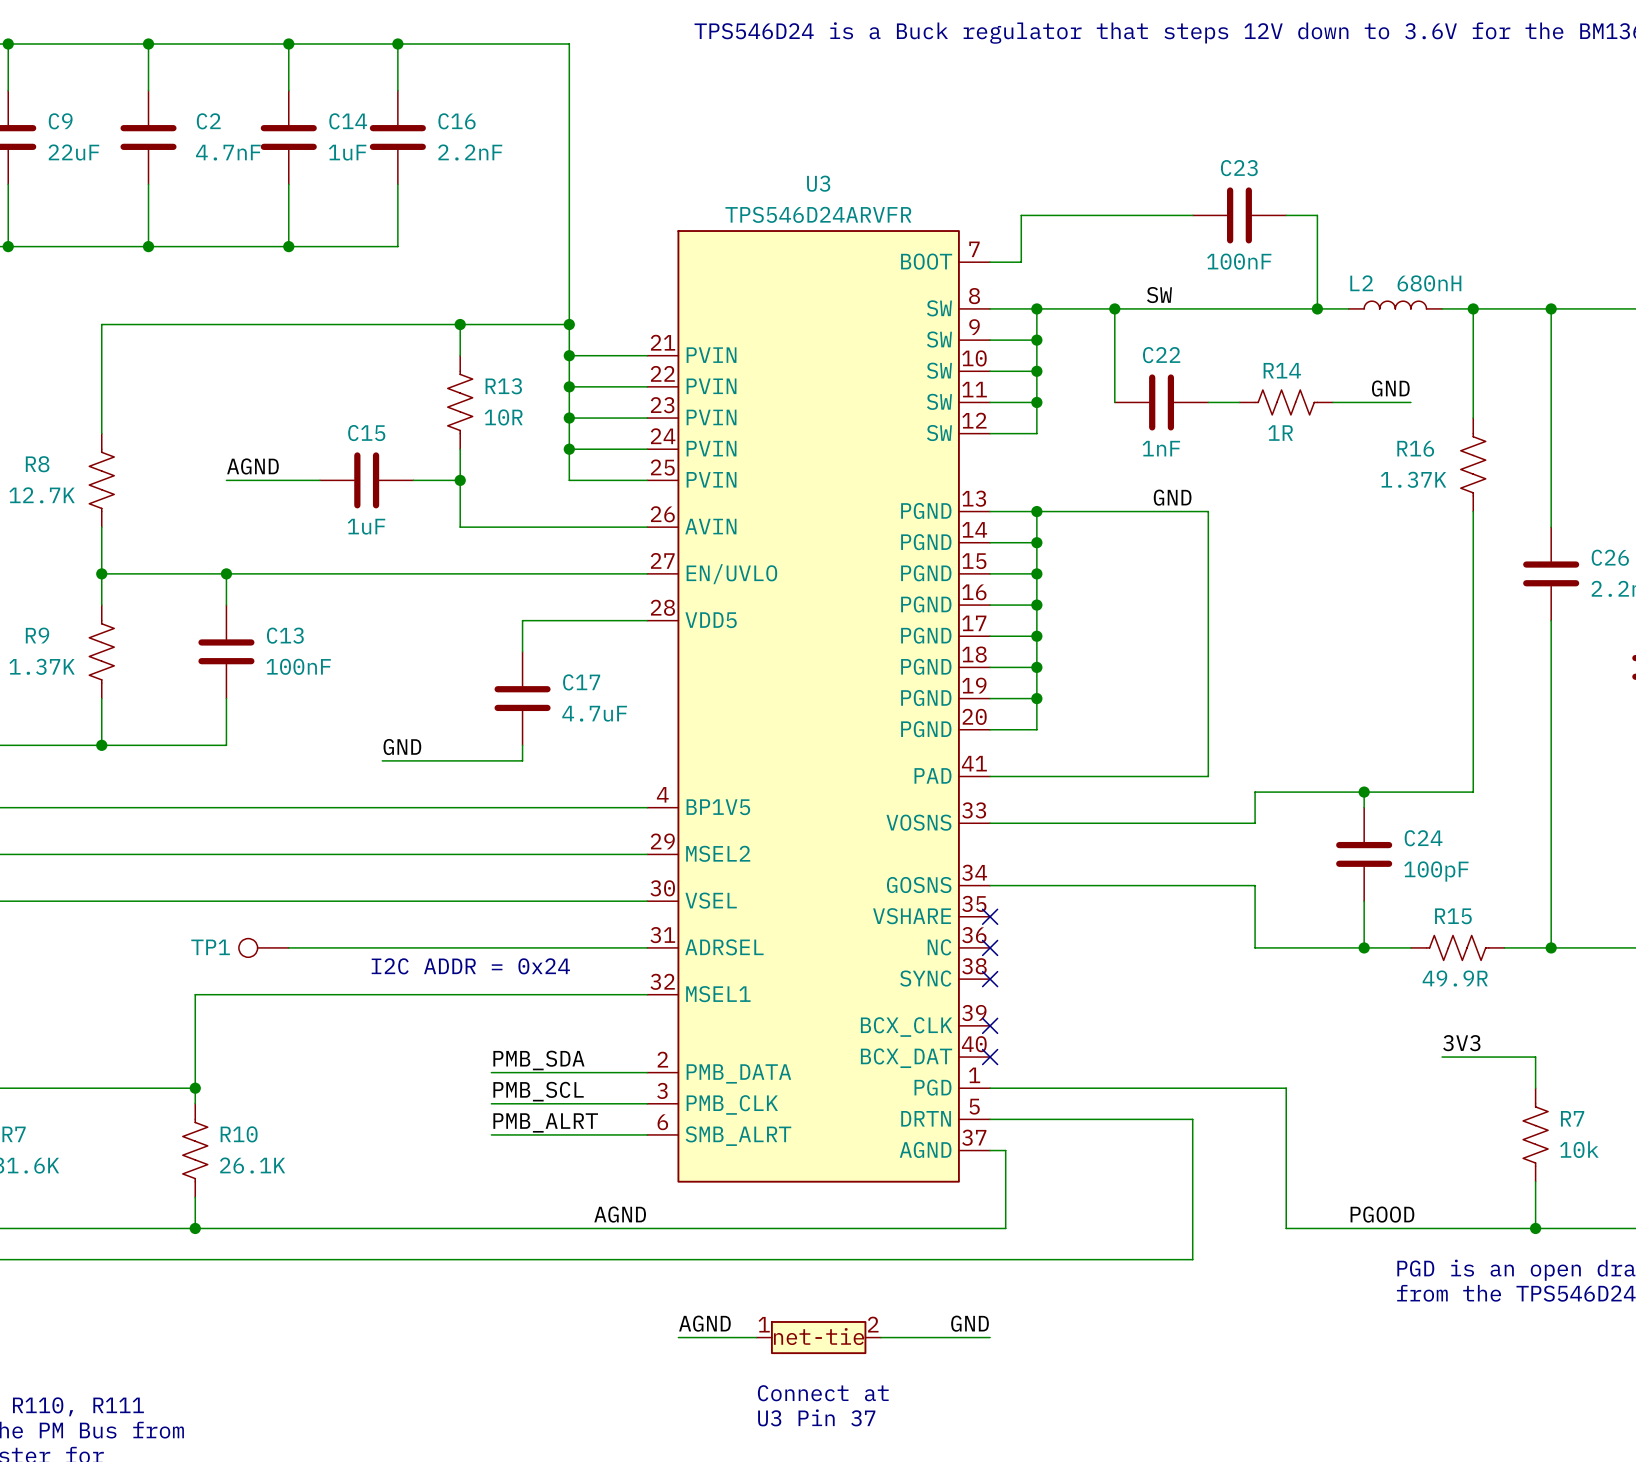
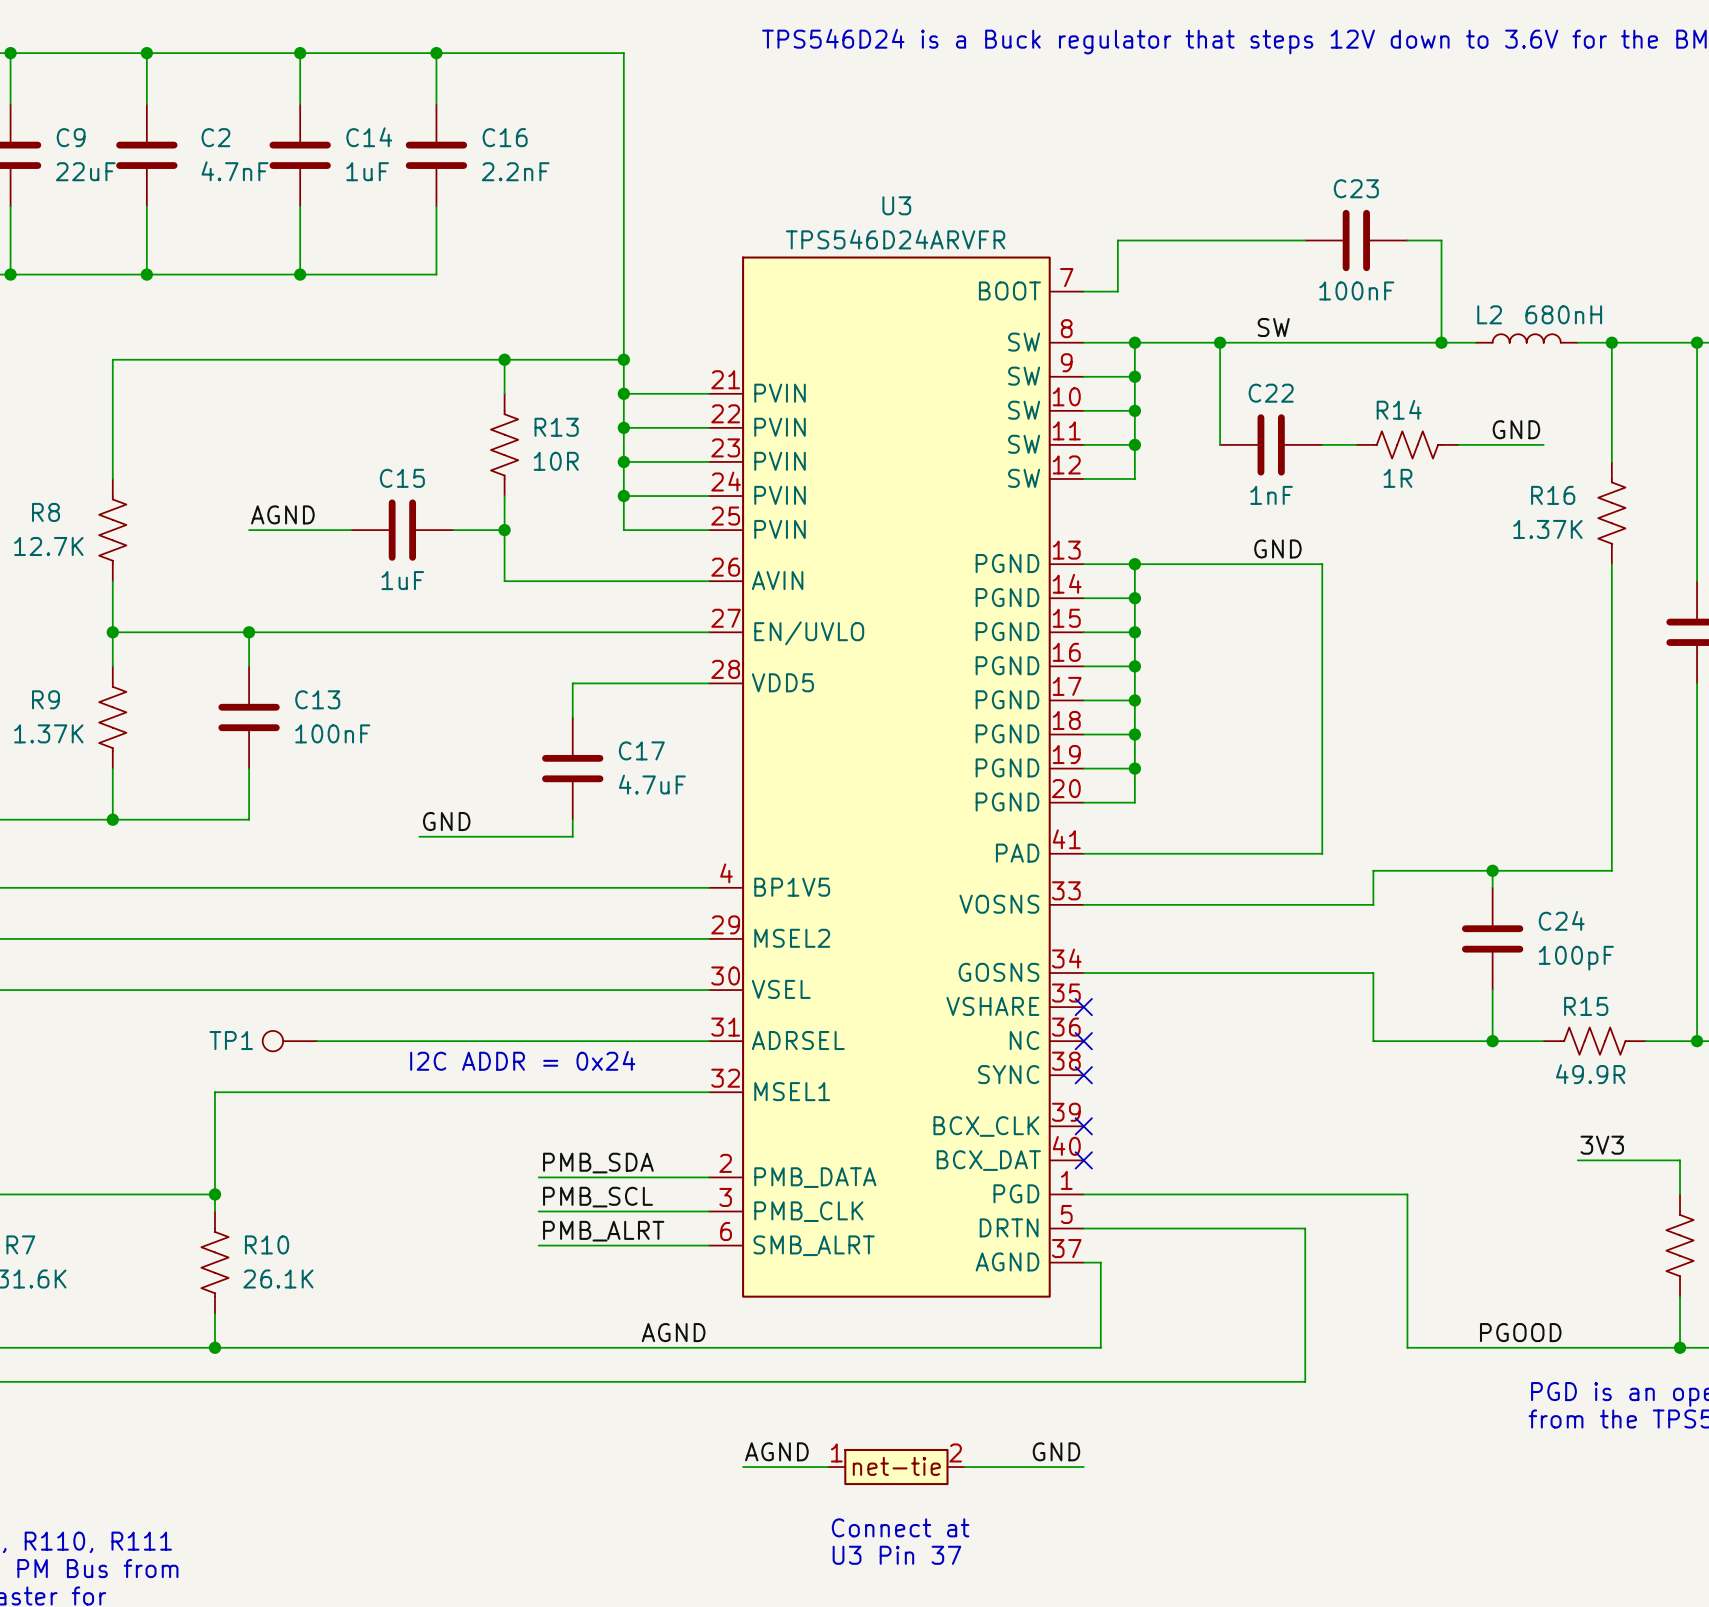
wire: (148, 43) (148, 90) -> (146, 53) (146, 104)
junction position: (148, 43) -> (146, 53)
wire: (288, 43) (288, 90) -> (300, 53) (300, 104)
junction position: (288, 43) -> (300, 53)
C2 position: (148, 137) -> (146, 155)
C14 position: (288, 137) -> (300, 155)
wire: (148, 184) (148, 246) -> (146, 206) (146, 274)
wire: (288, 184) (288, 246) -> (300, 206) (300, 274)
junction position: (148, 246) -> (146, 274)
junction position: (288, 246) -> (300, 274)

